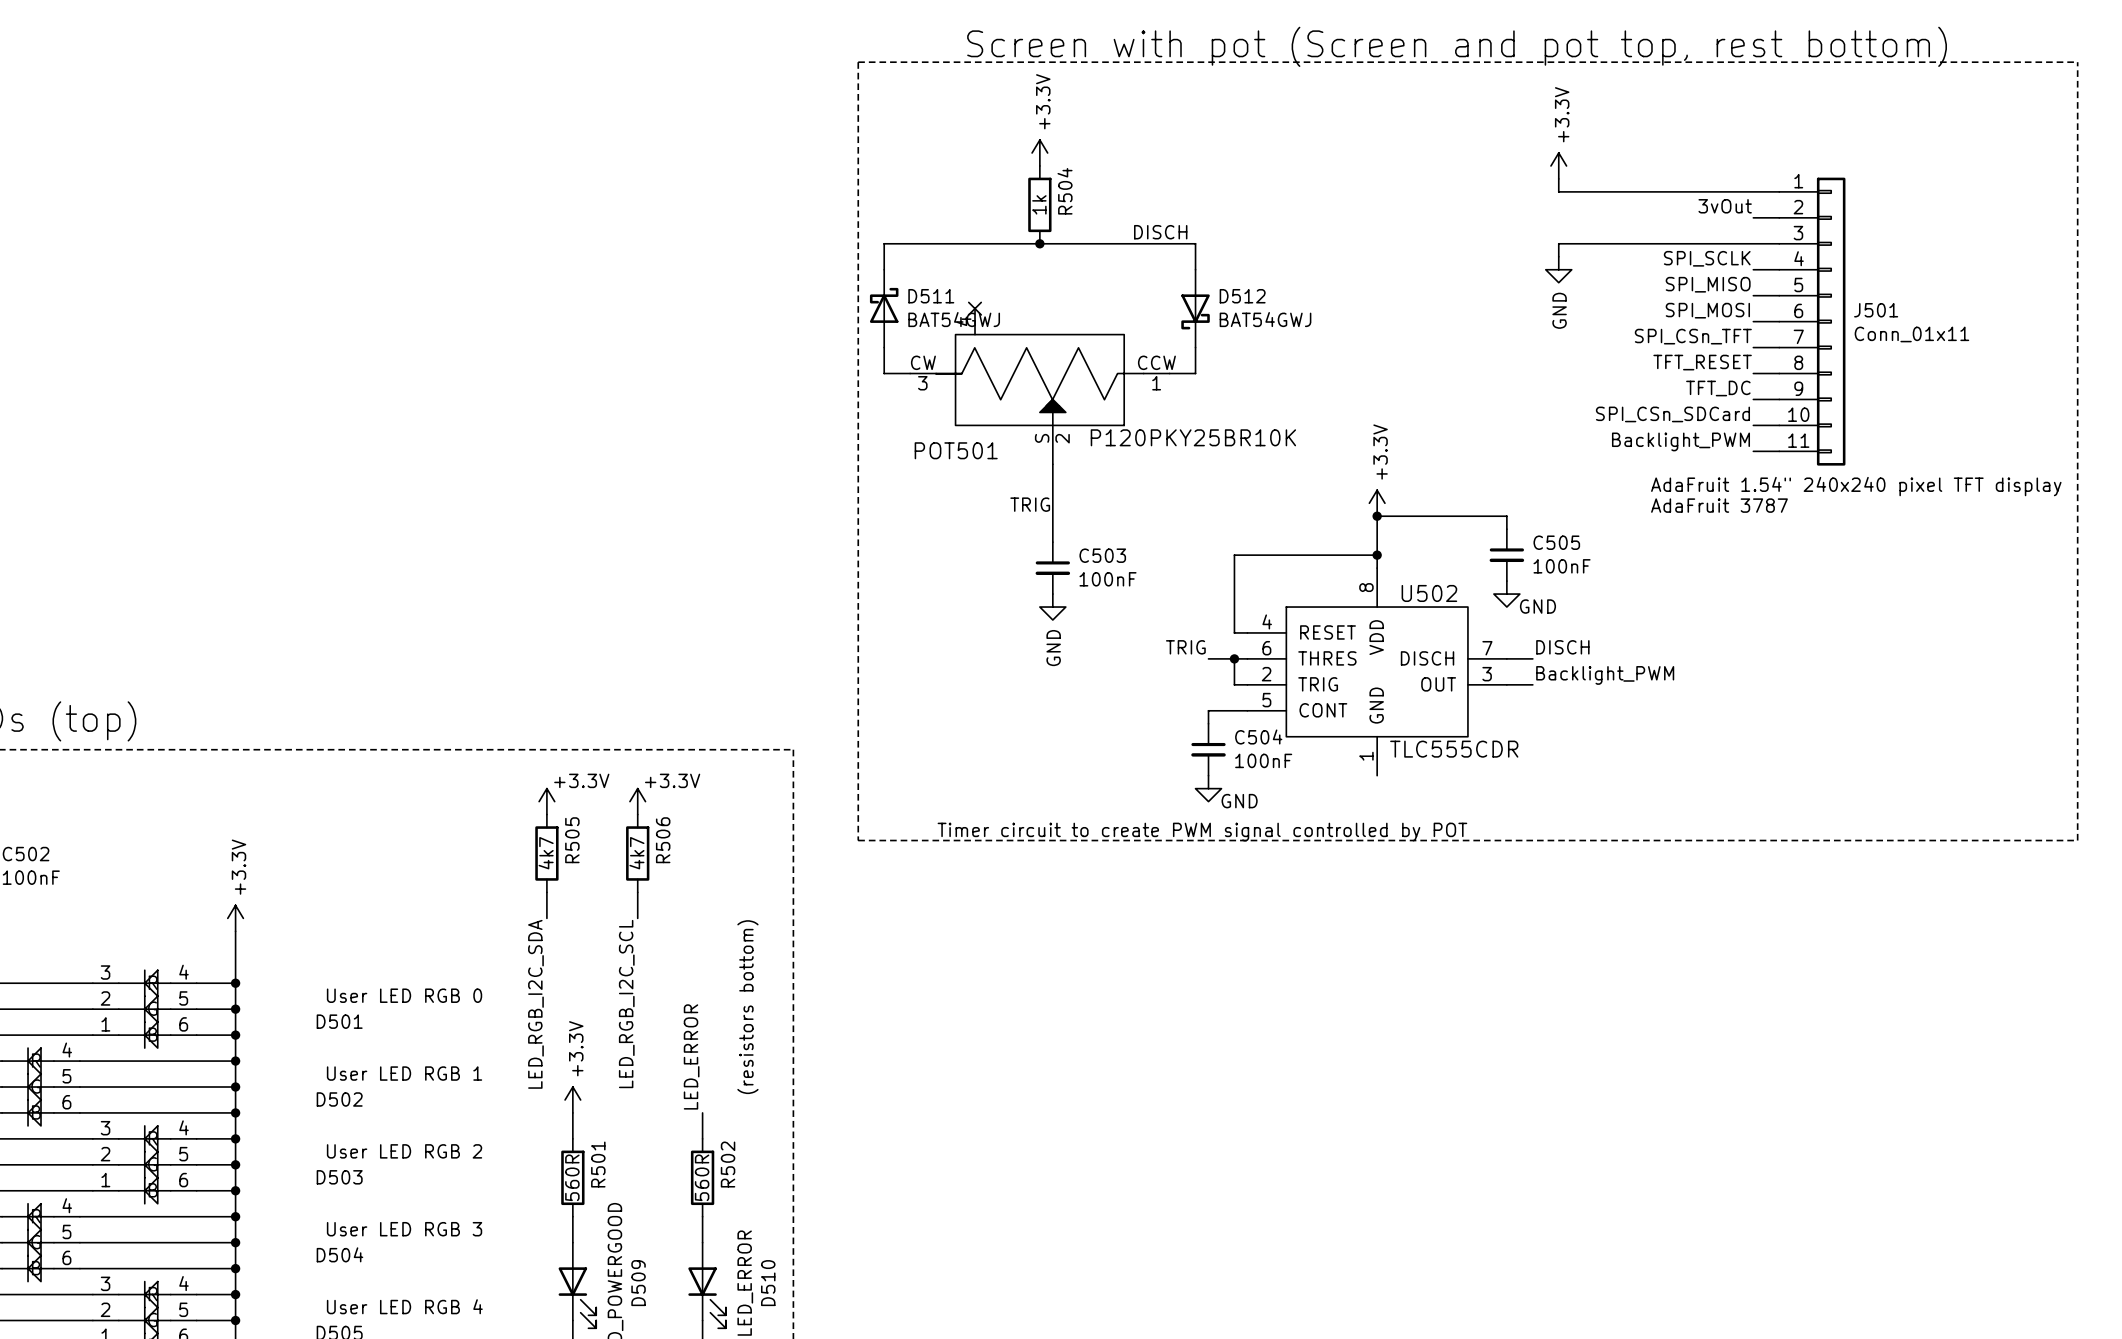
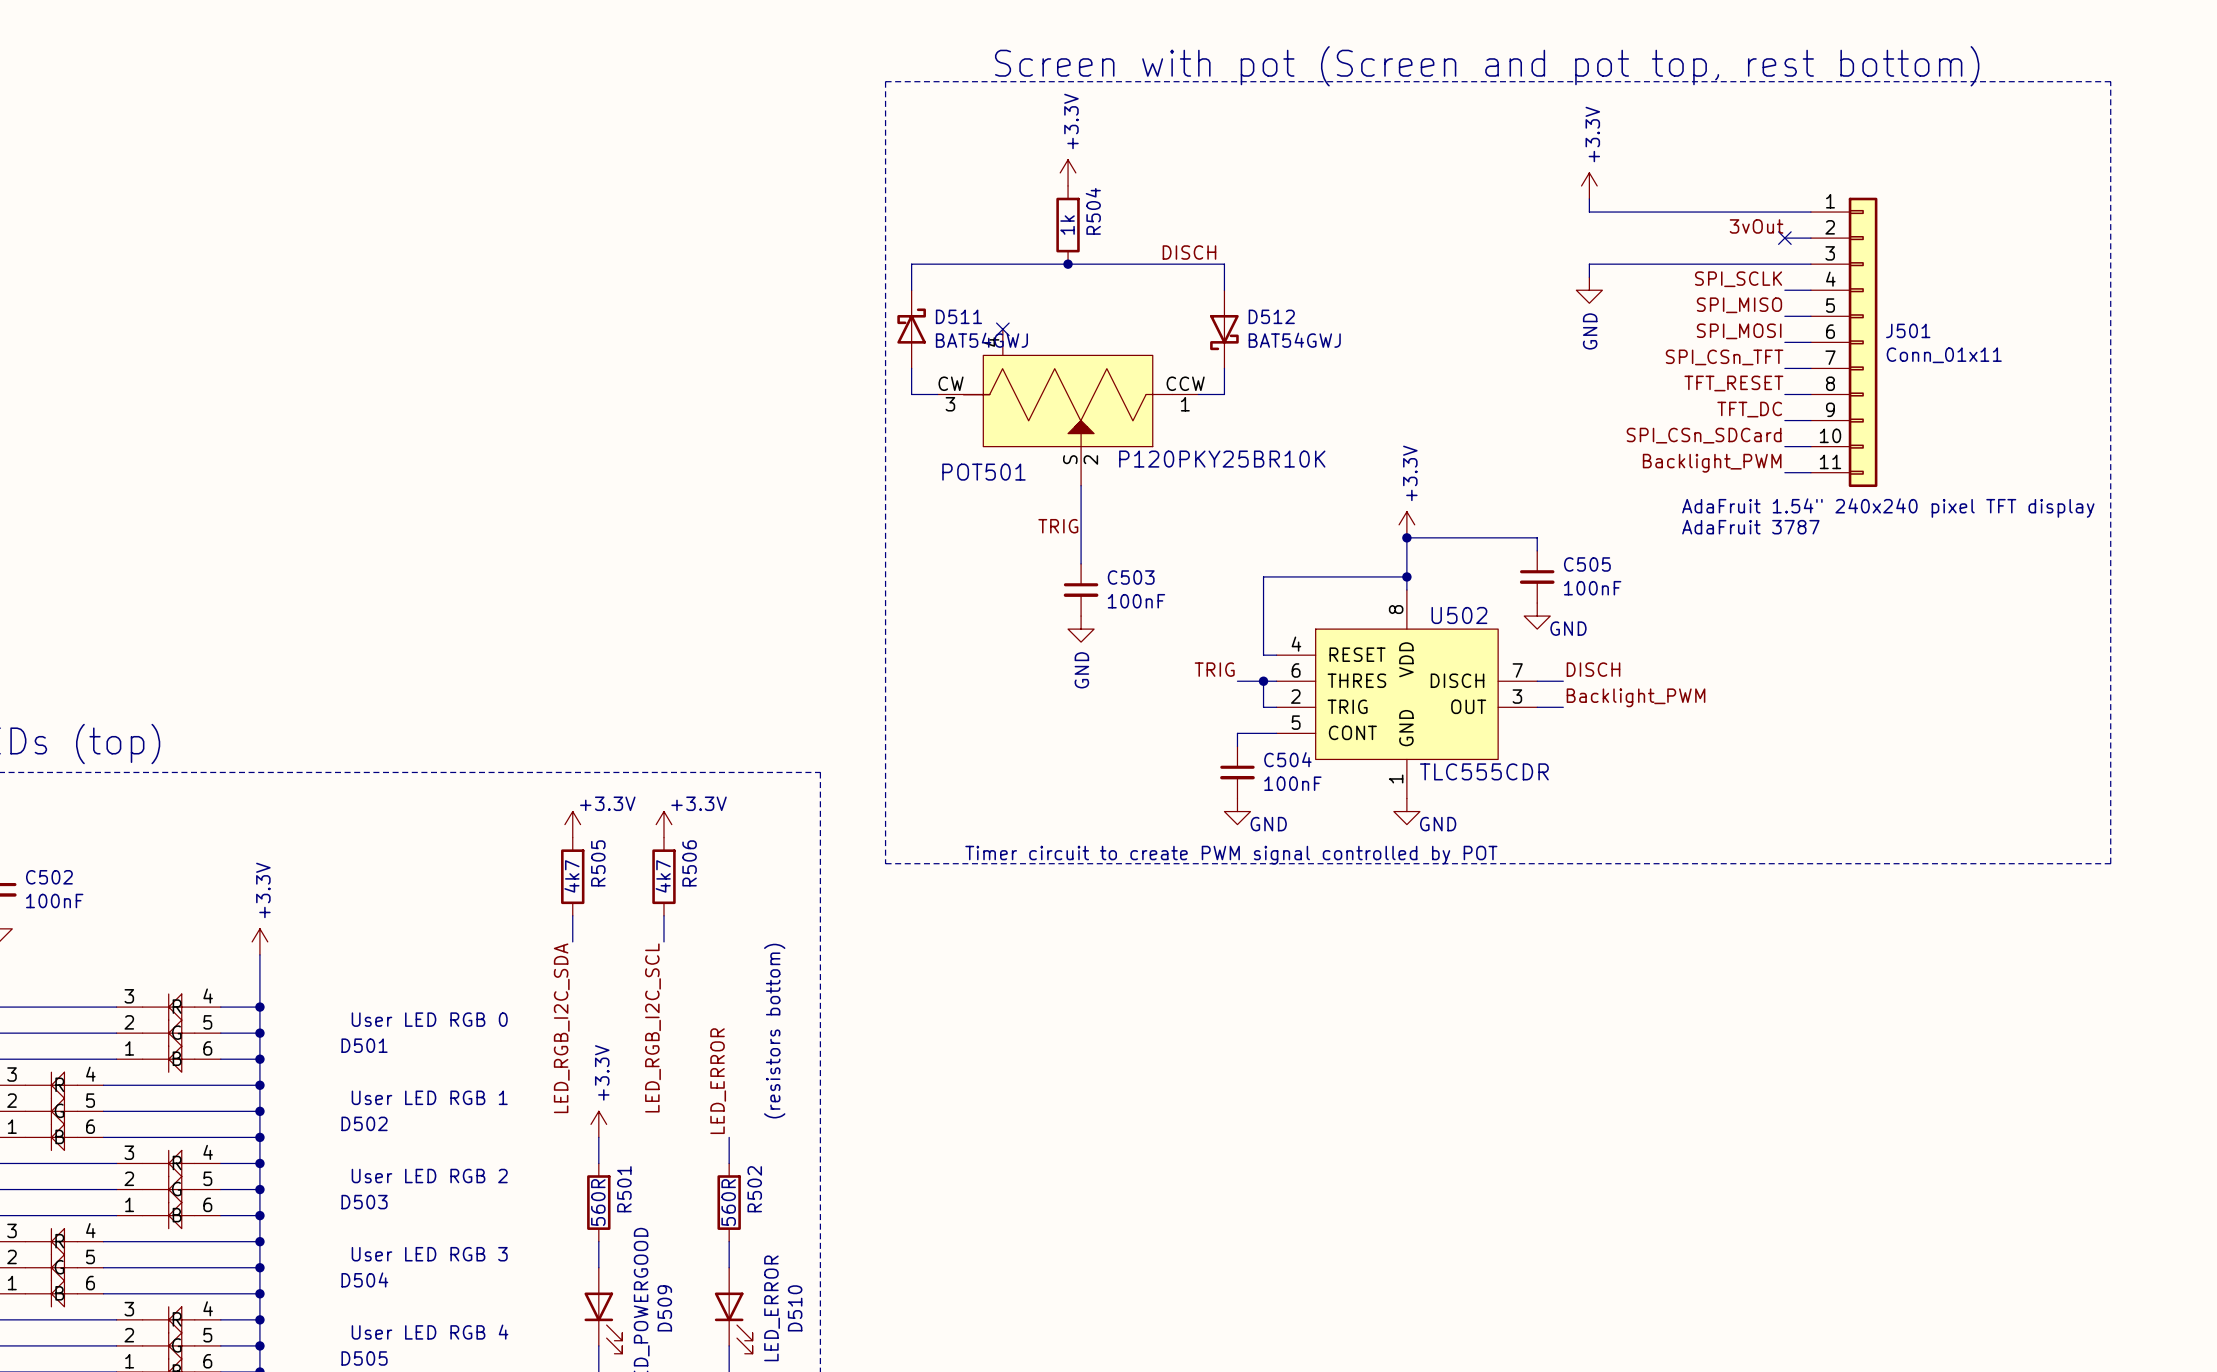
no-connect mark: none -> (1784, 238)
power symbol: none -> GND (1406, 811)

